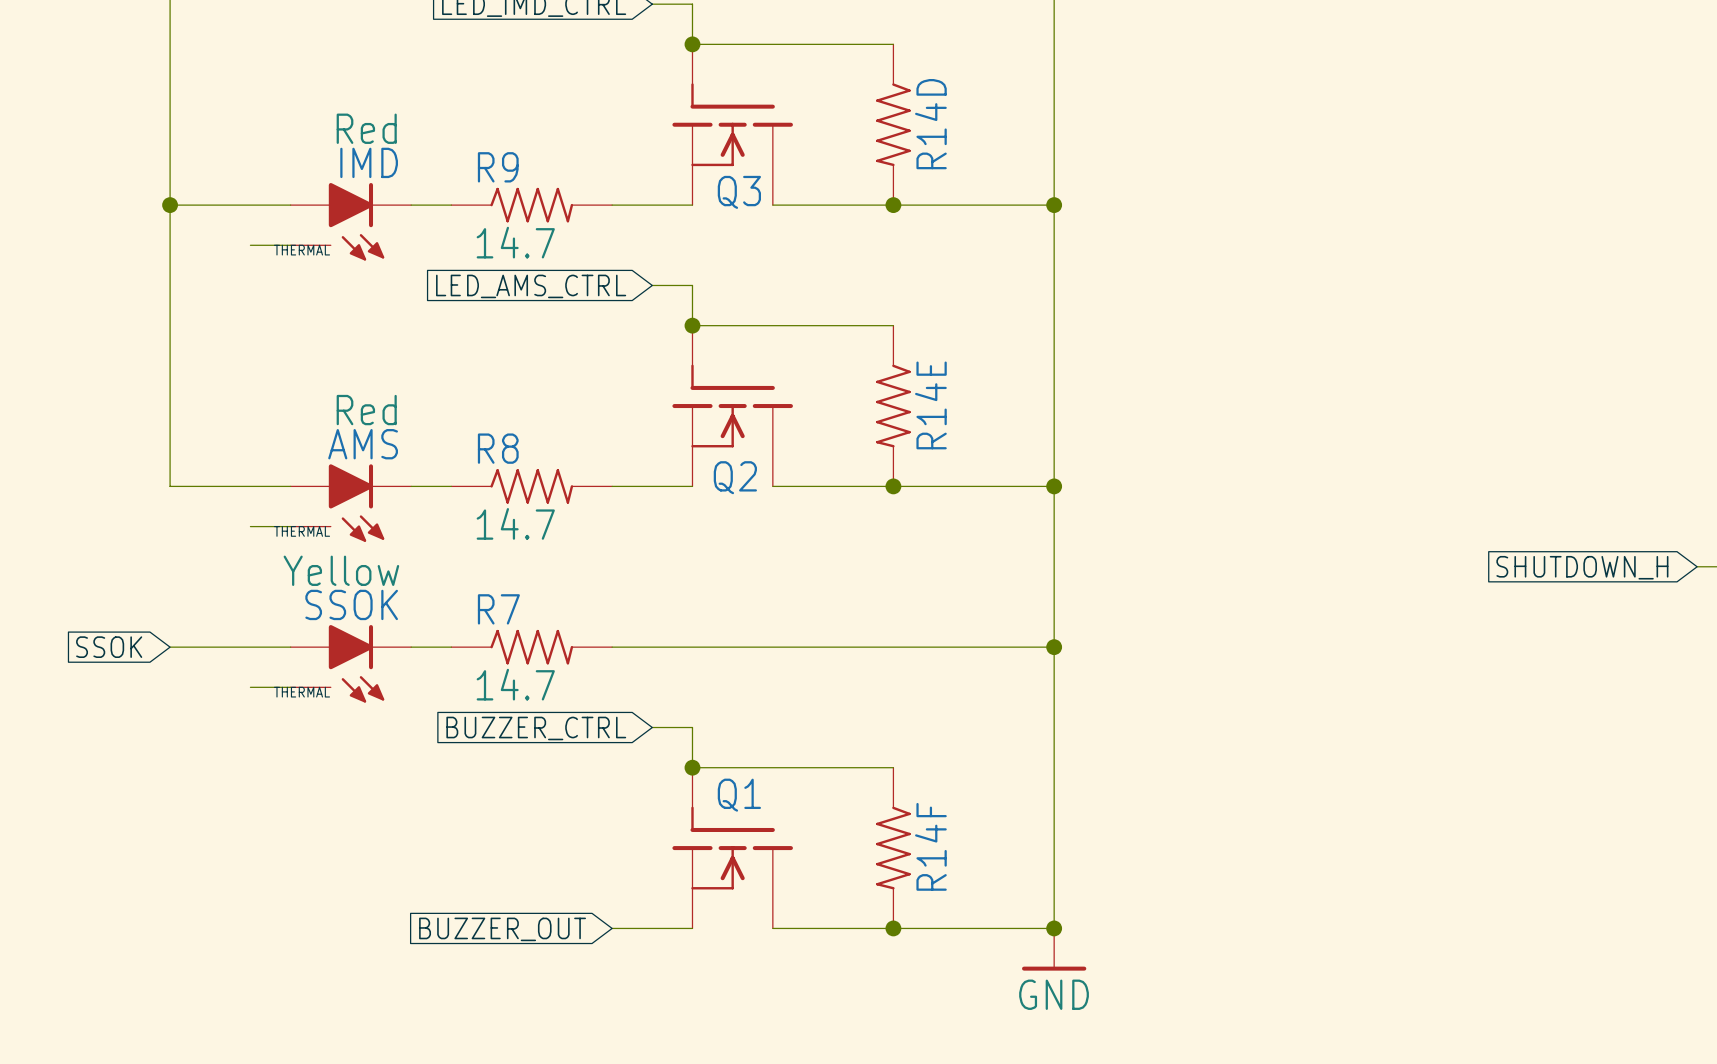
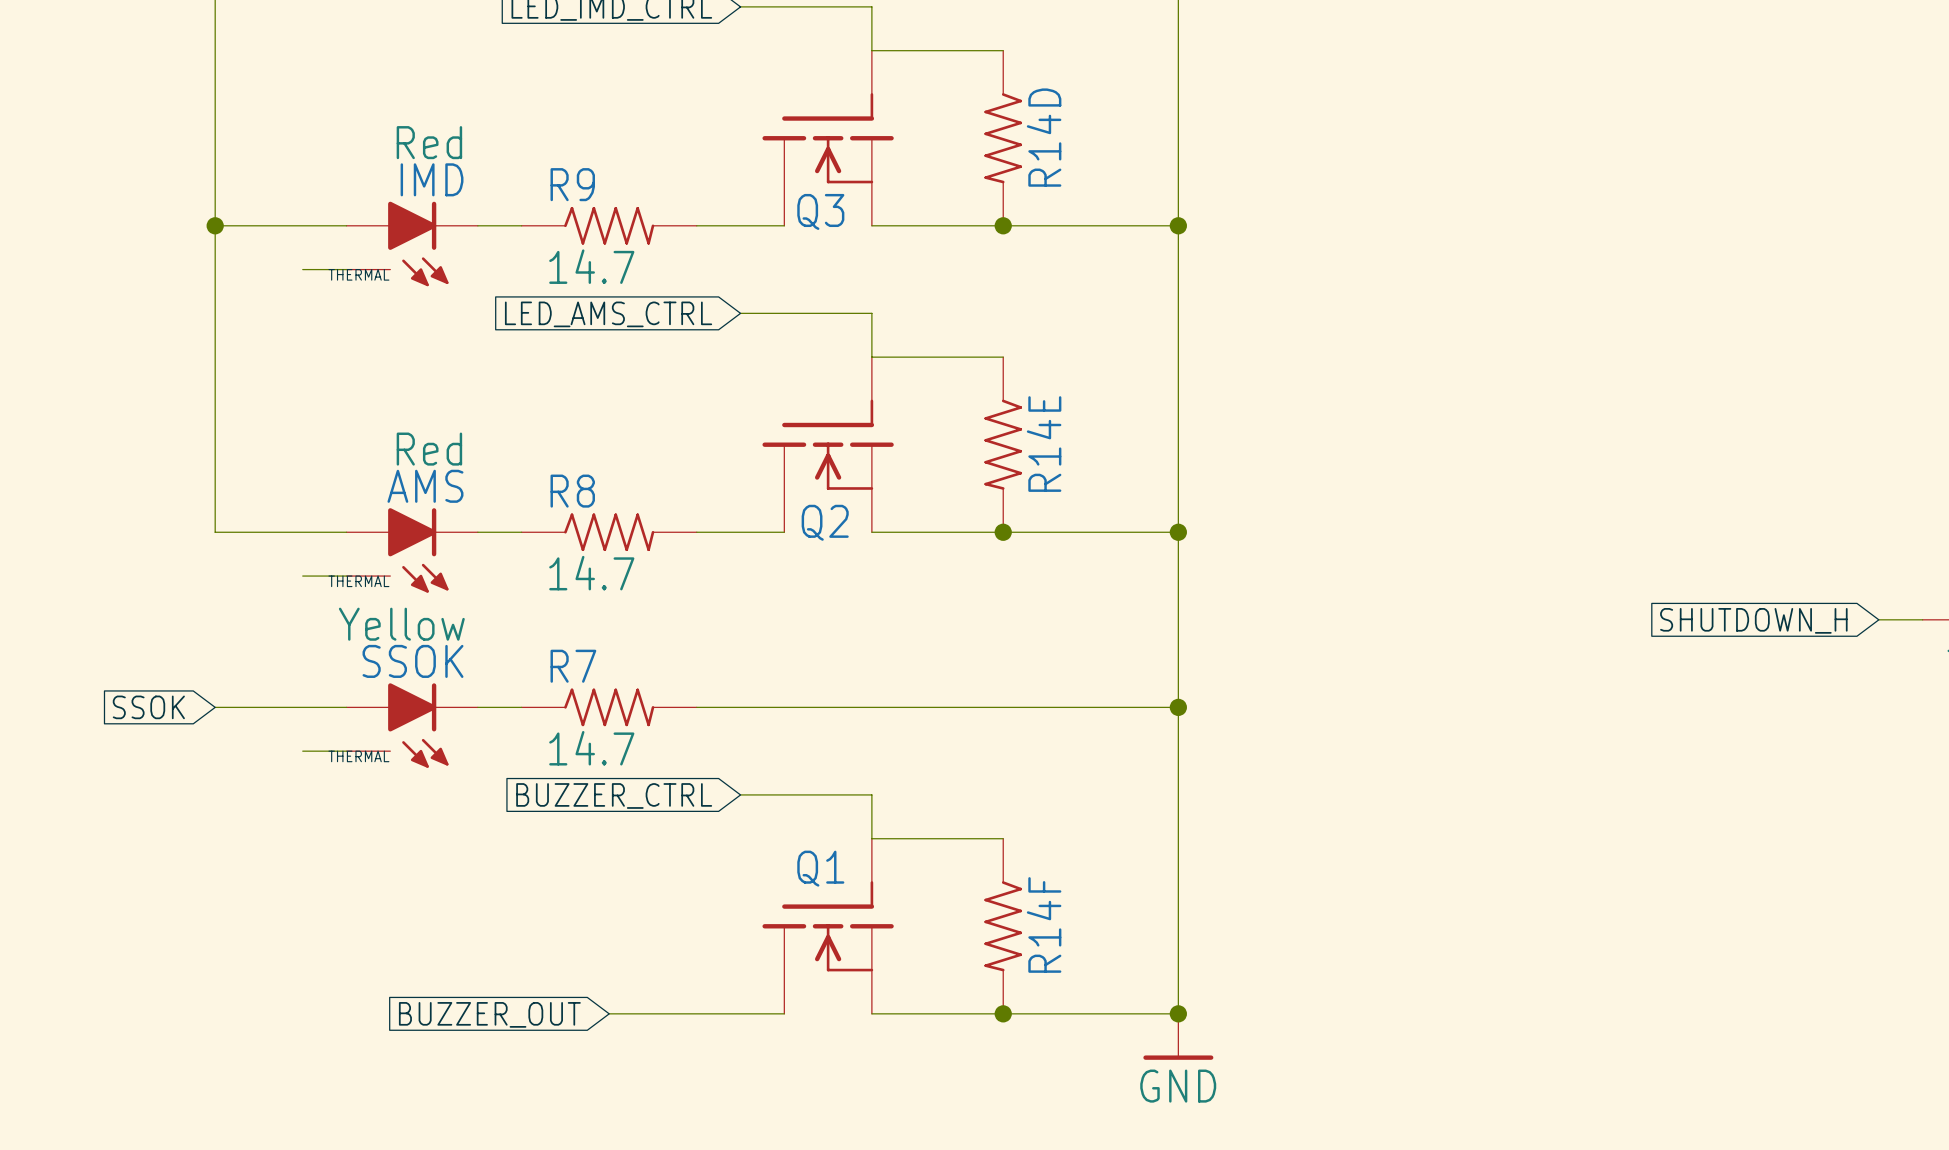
wire: (692, 4) (692, 44) (772, 44) -> (784, 6) (871, 6) (871, 50)
junction: (692, 44) -> none
Q3 flip: as is (732, 124) -> left-right (828, 138)
wire: (692, 285) (692, 325) (772, 325) -> (784, 313) (871, 313) (871, 357)
junction: (692, 325) -> none
Q2 flip: as is (732, 406) -> left-right (828, 444)
wire: (692, 727) (692, 767) (772, 767) -> (784, 794) (871, 794) (871, 838)
junction: (692, 767) -> none
Q1 flip: as is (732, 848) -> left-right (828, 926)
wire: none -> (609, 1013) (696, 1013)
global label position: BUZZER_OUT (502, 929) -> BUZZER_OUT (489, 1014)

